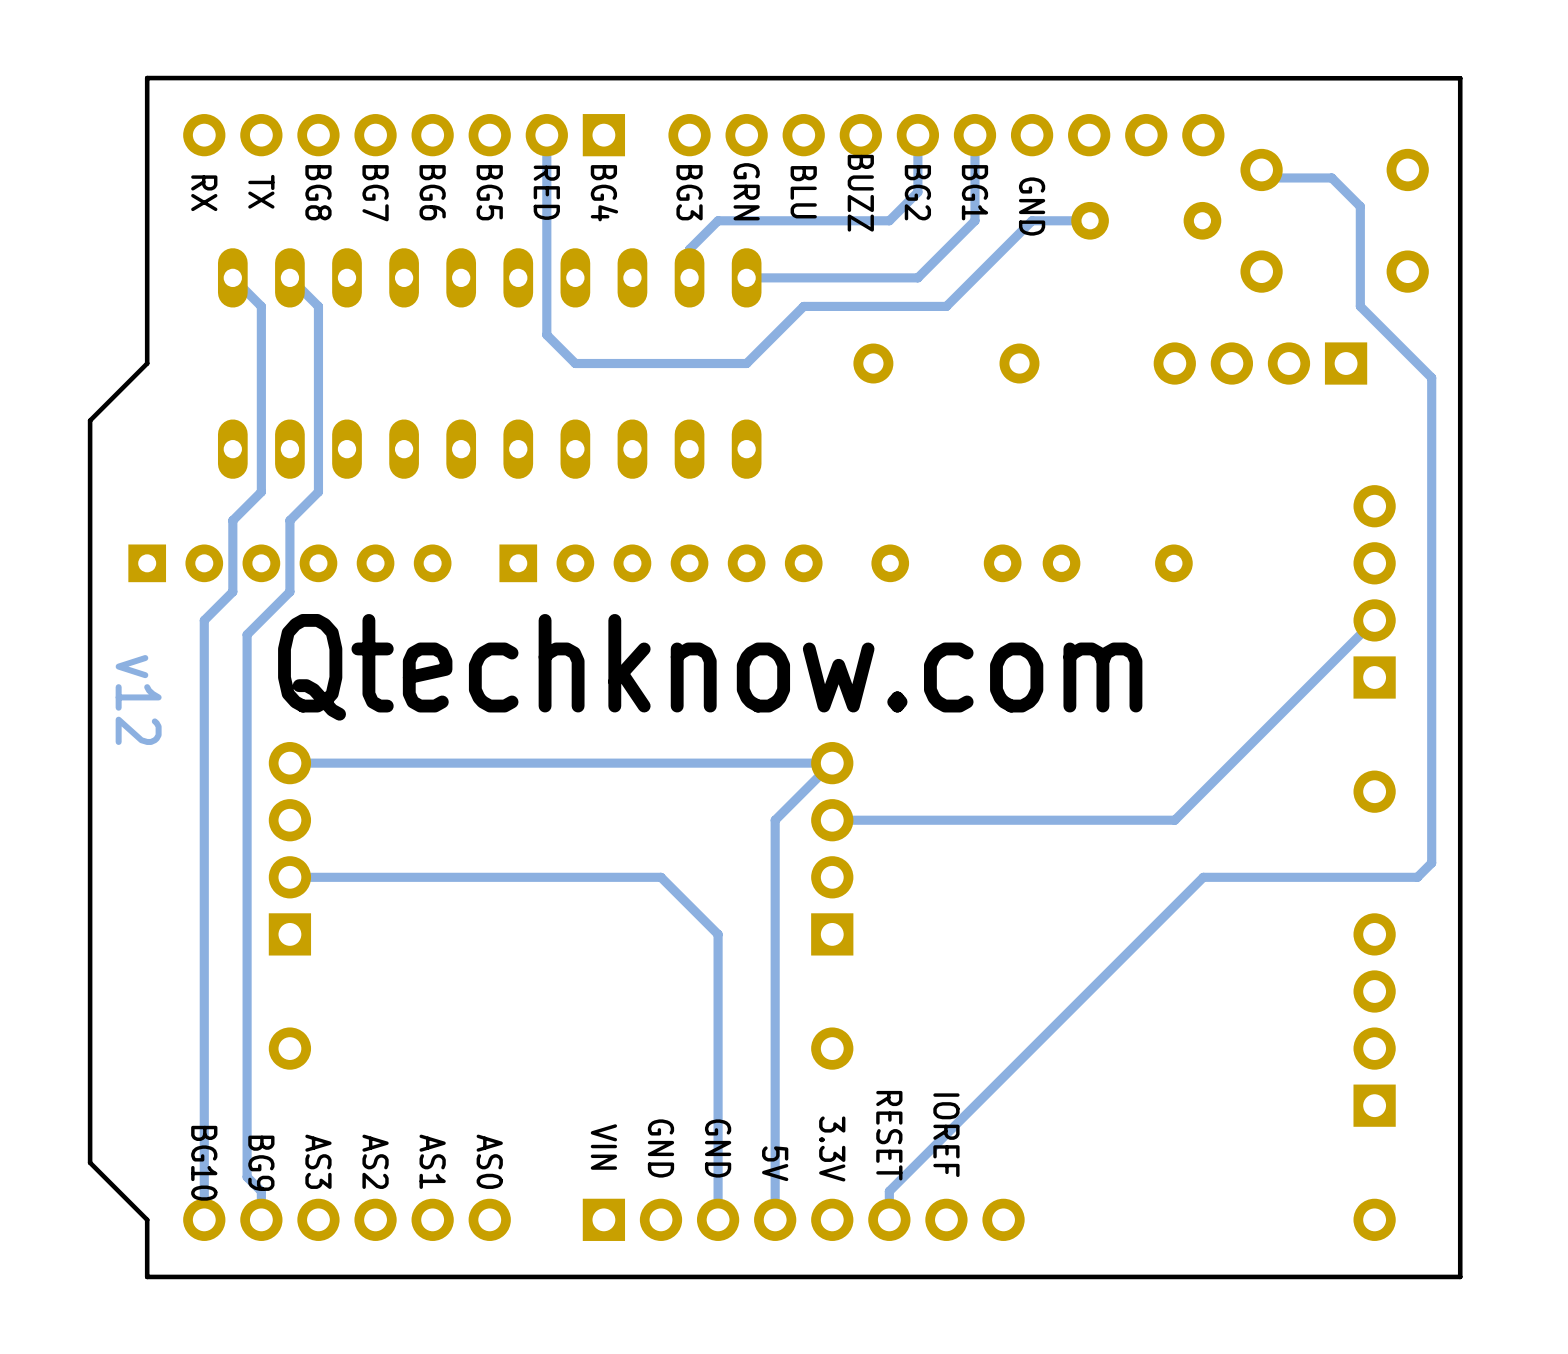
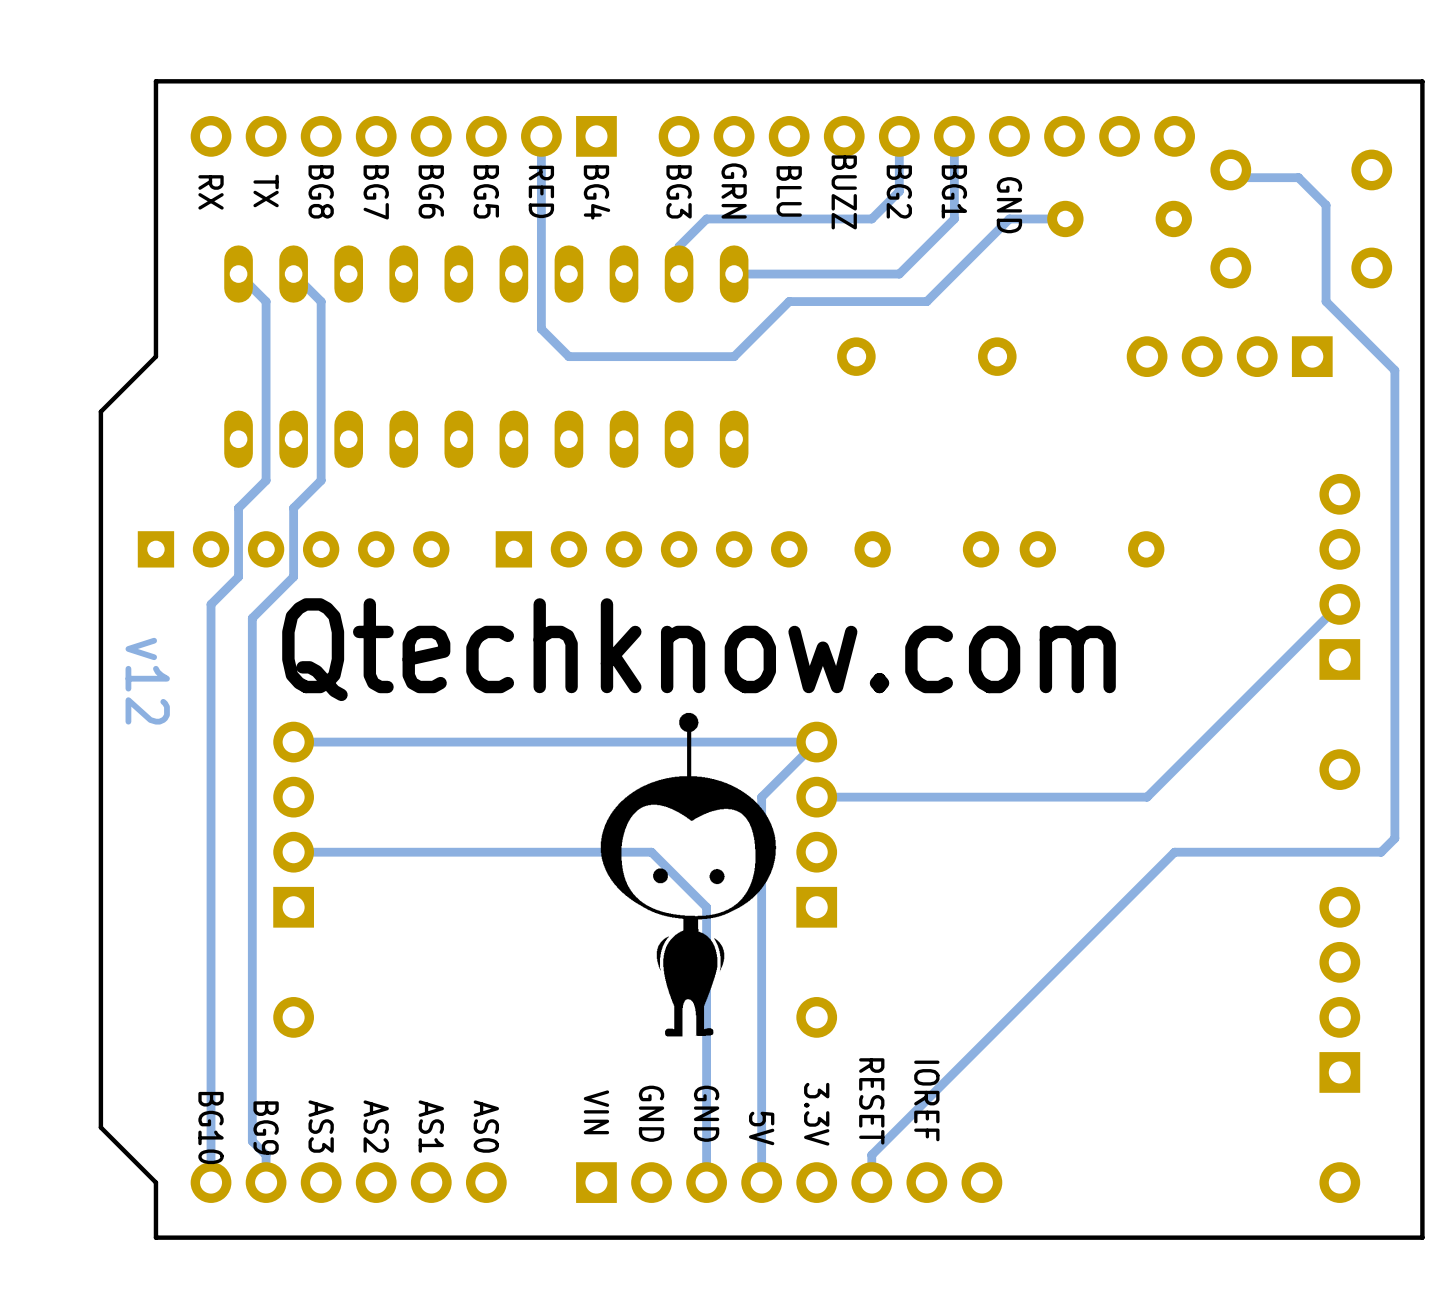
drawing: none -> [600, 712, 777, 1037]

